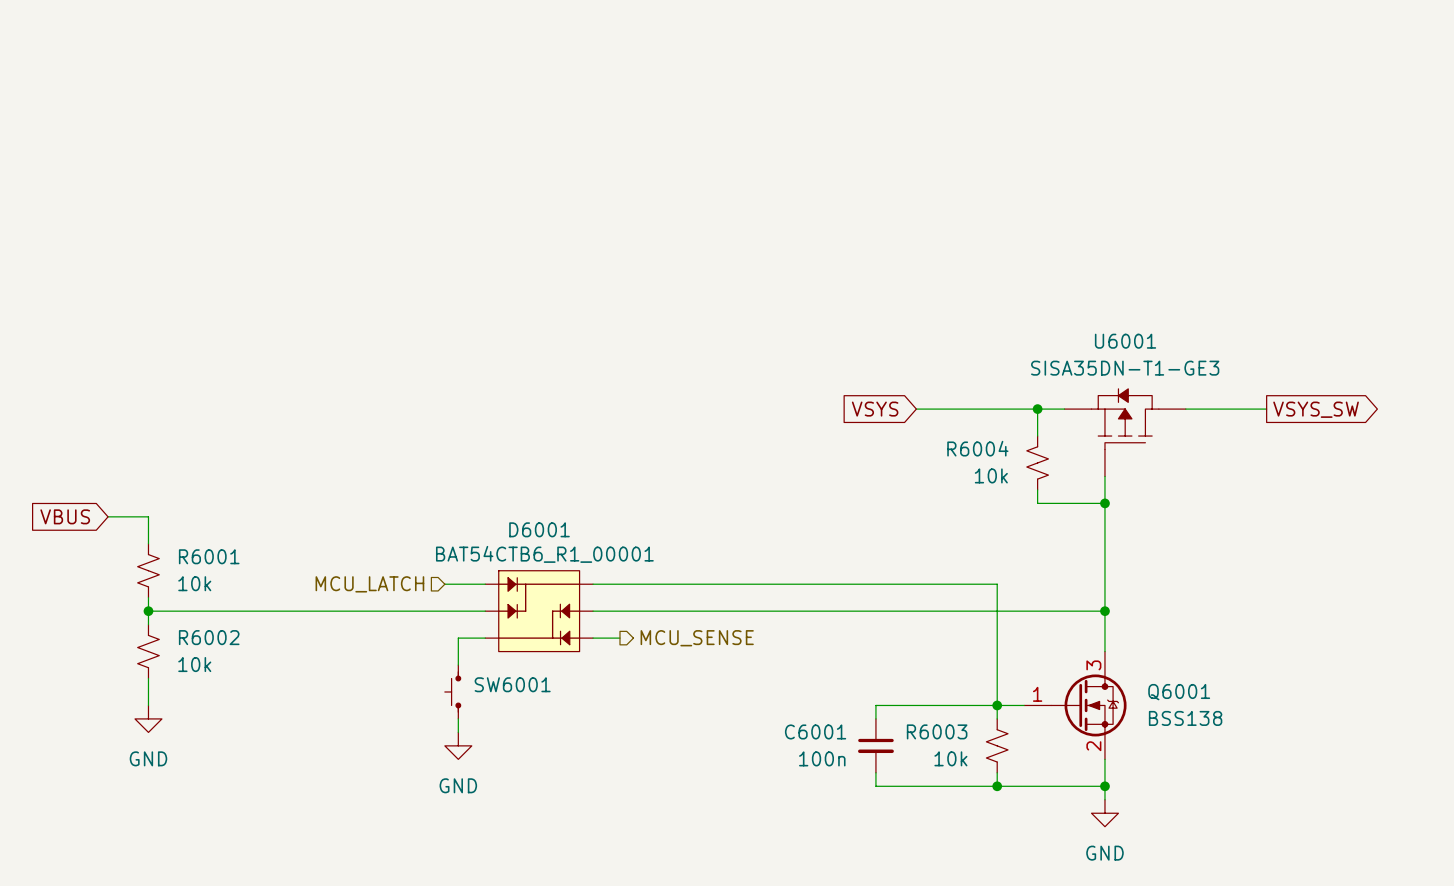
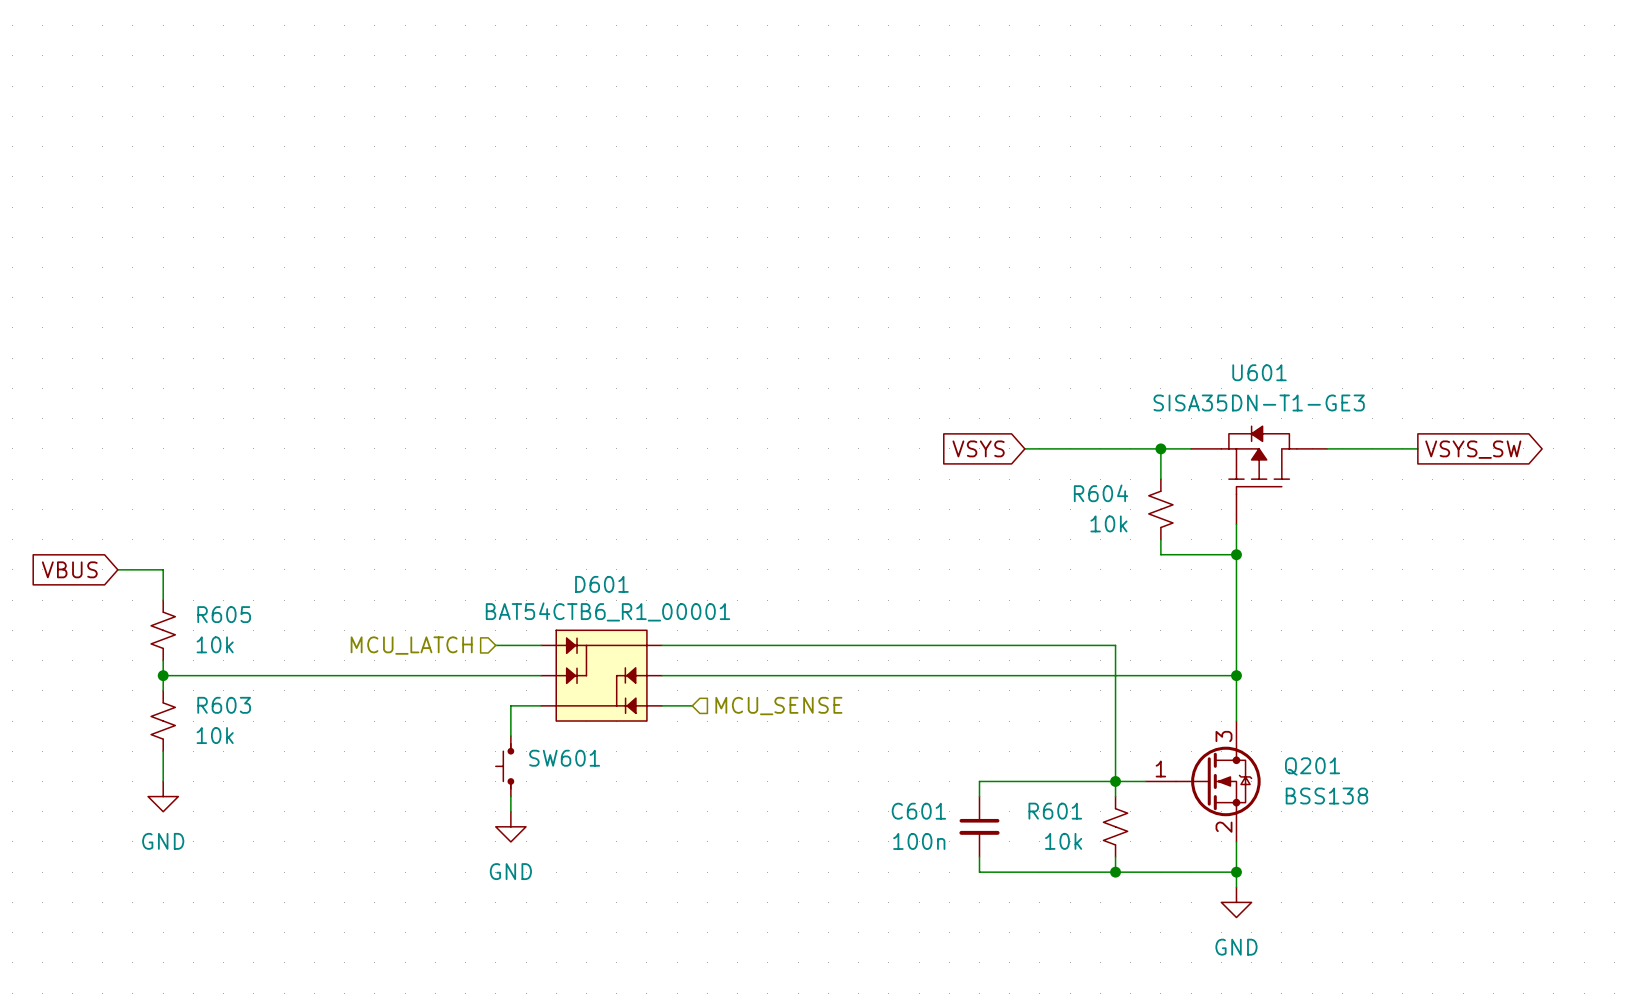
U6001 name: U6001 (1125, 341) -> U601 (1259, 372)
R6004 name: R6004 (977, 448) -> R604 (1101, 493)
D6001 name: D6001 (539, 529) -> D601 (601, 584)
R6001 name: R6001 (209, 556) -> R605 (224, 614)
R6002 name: R6002 (209, 637) -> R603 (224, 705)
hierarchical label shape: output (697, 638) -> input (778, 706)
SW6001 name: SW6001 (512, 684) -> SW601 (564, 758)
Q6001 name: Q6001 (1179, 692) -> Q201 (1312, 766)
C6001 name: C6001 (815, 731) -> C601 (918, 811)
R6003 name: R6003 (937, 731) -> R601 (1055, 811)

